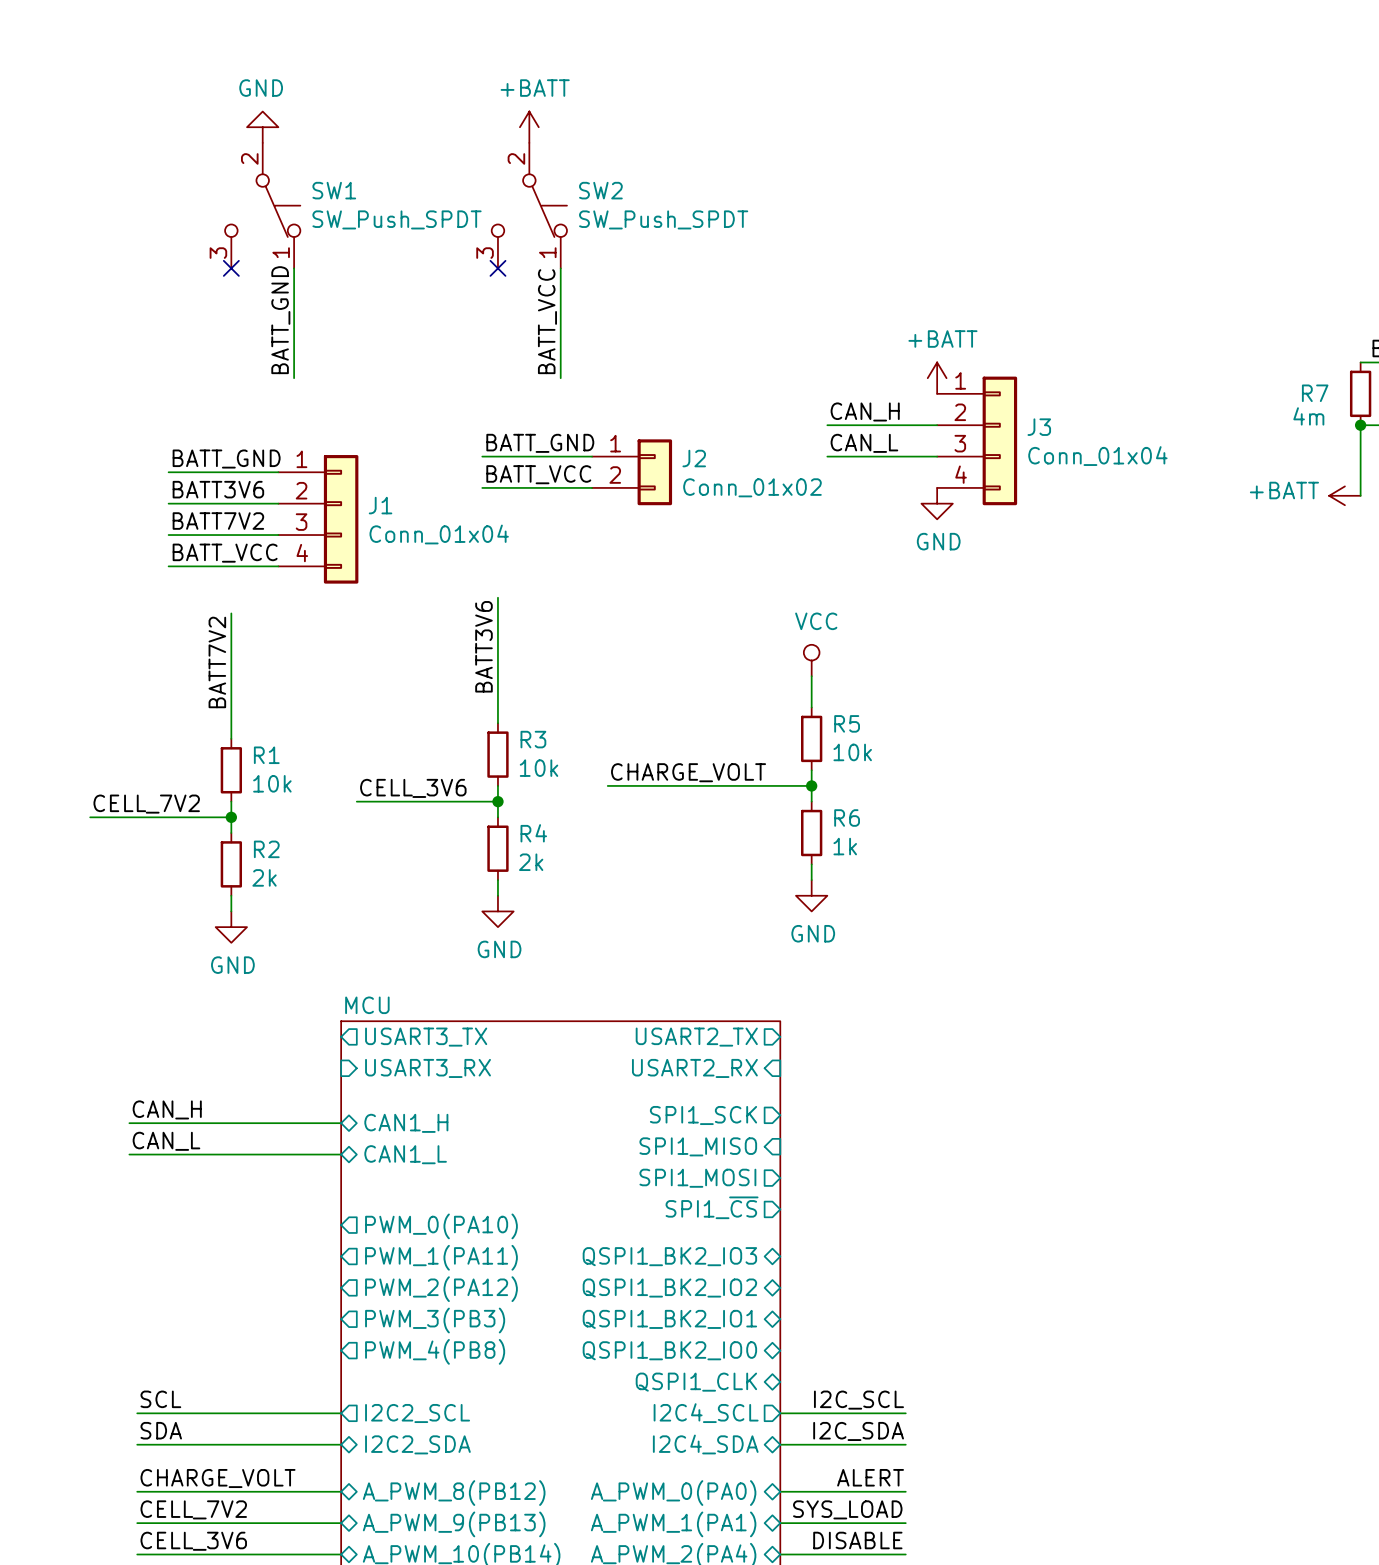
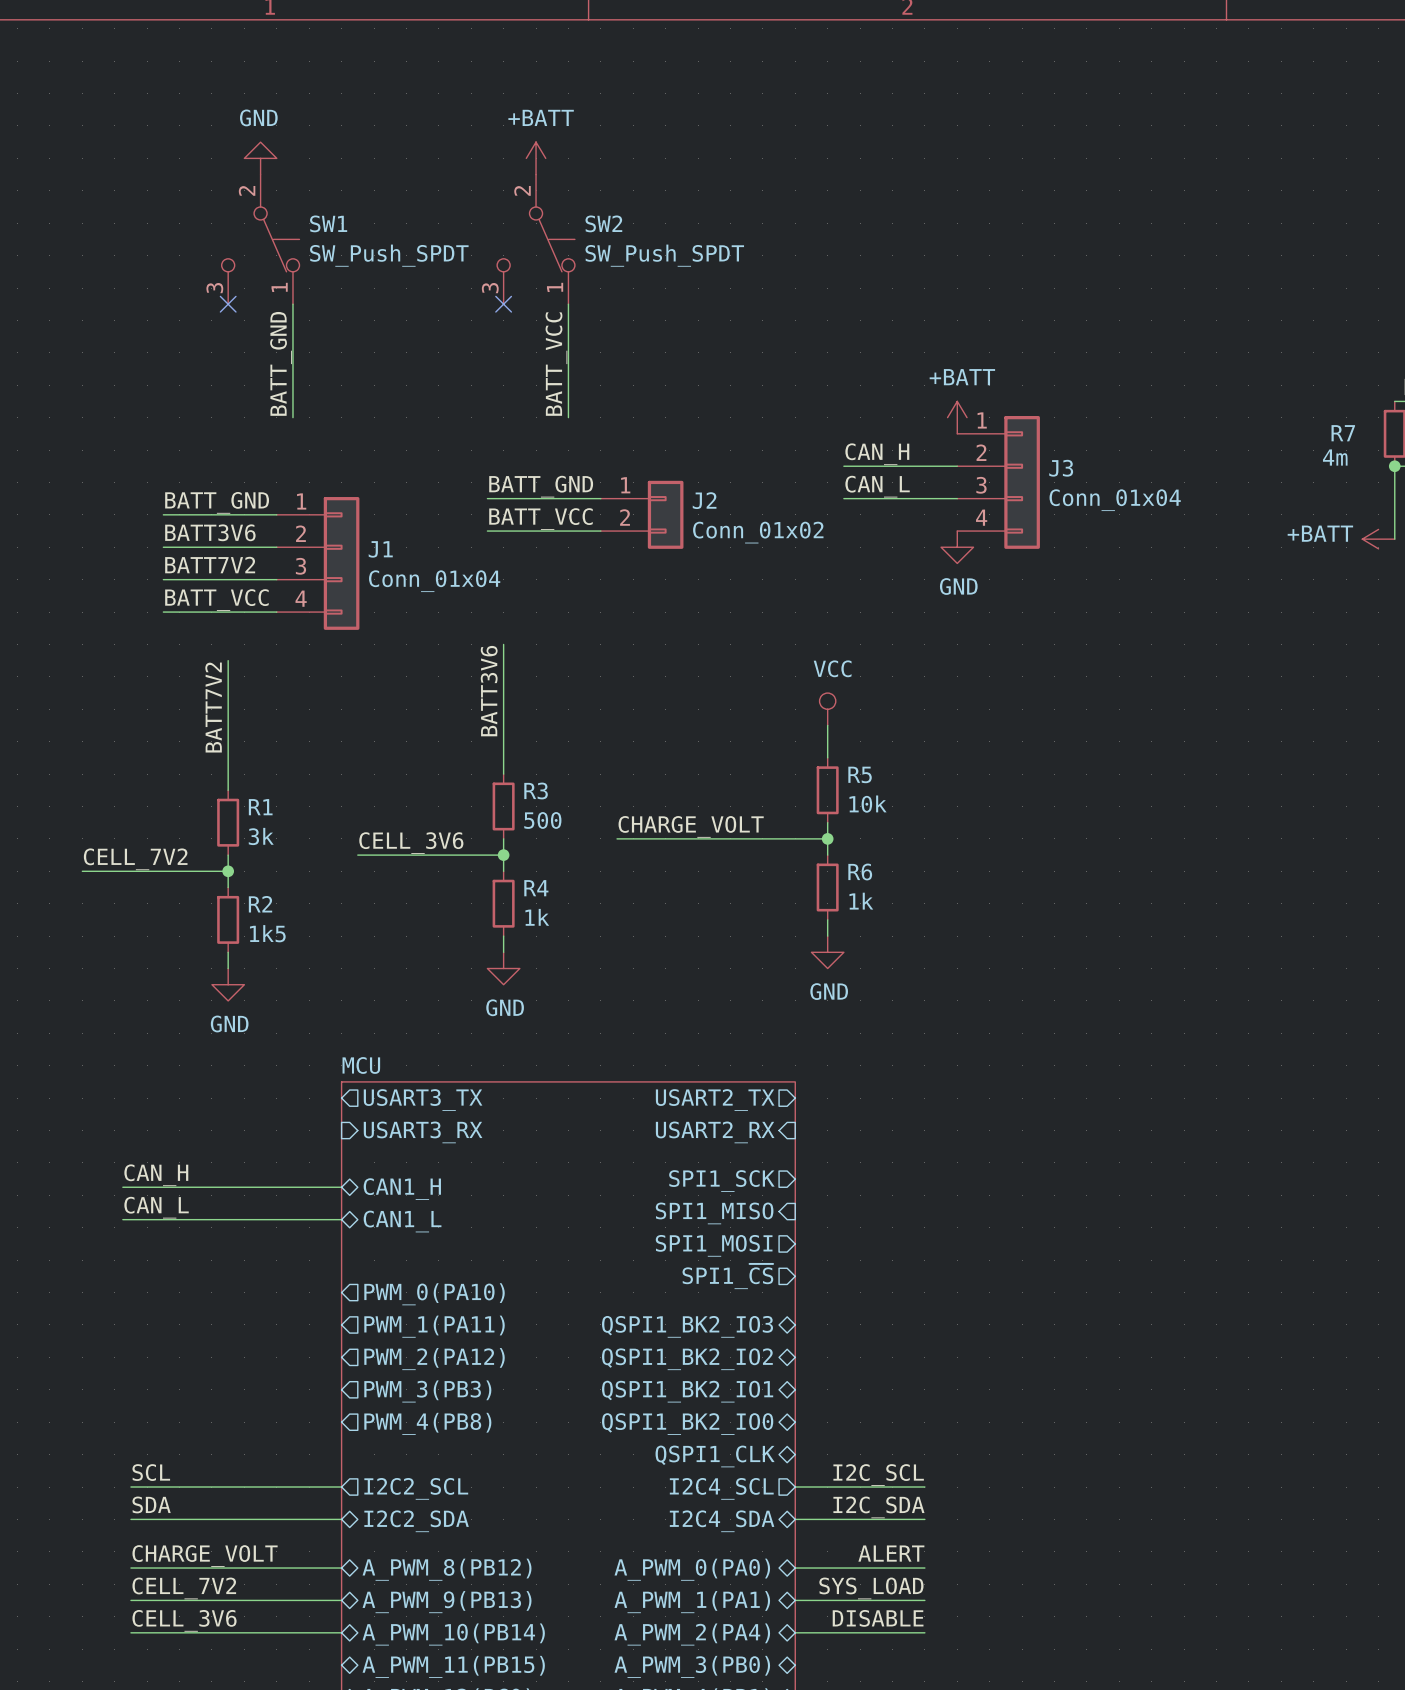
R3 value: 10k (539, 768) -> 500 (542, 820)
R1 value: 10k (272, 783) -> 3k (261, 836)
R4 value: 2k (531, 862) -> 1k (537, 917)
R2 value: 2k (264, 877) -> 1k5 (267, 933)

